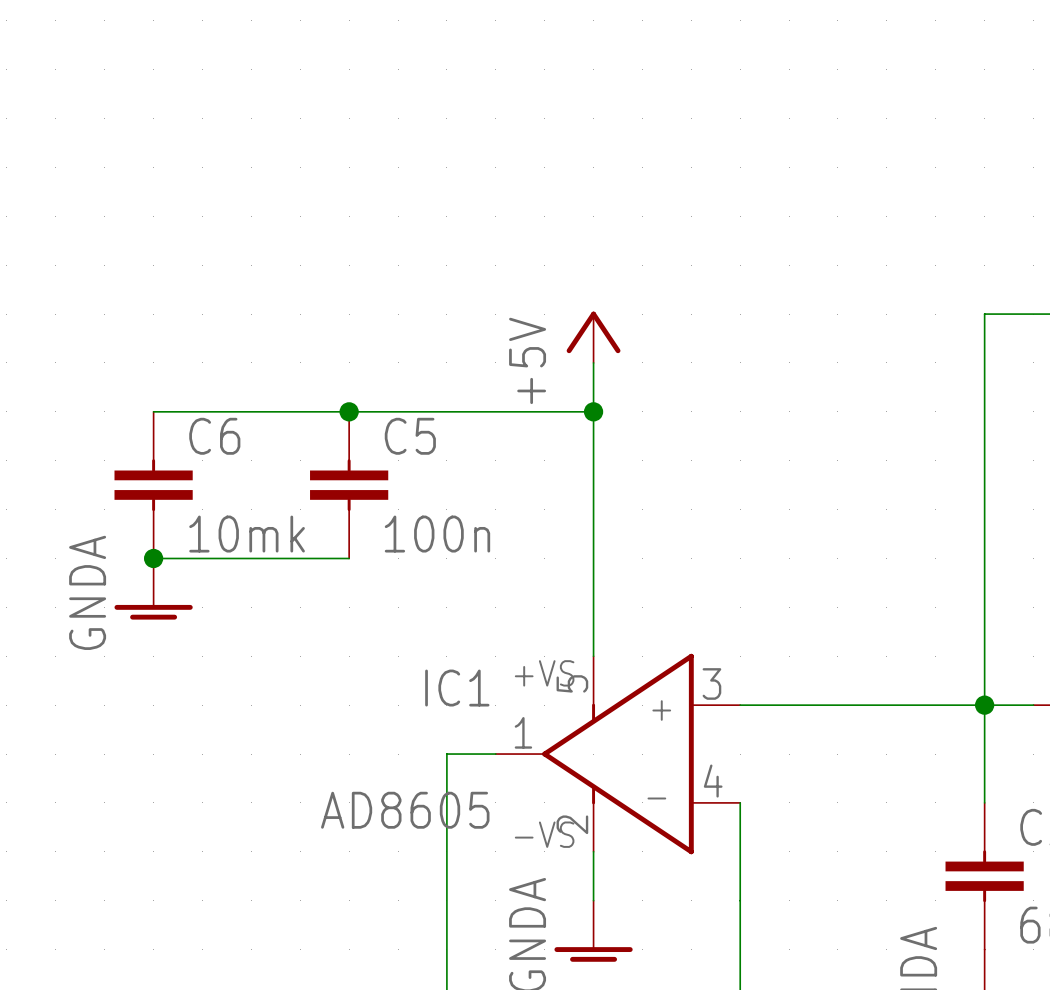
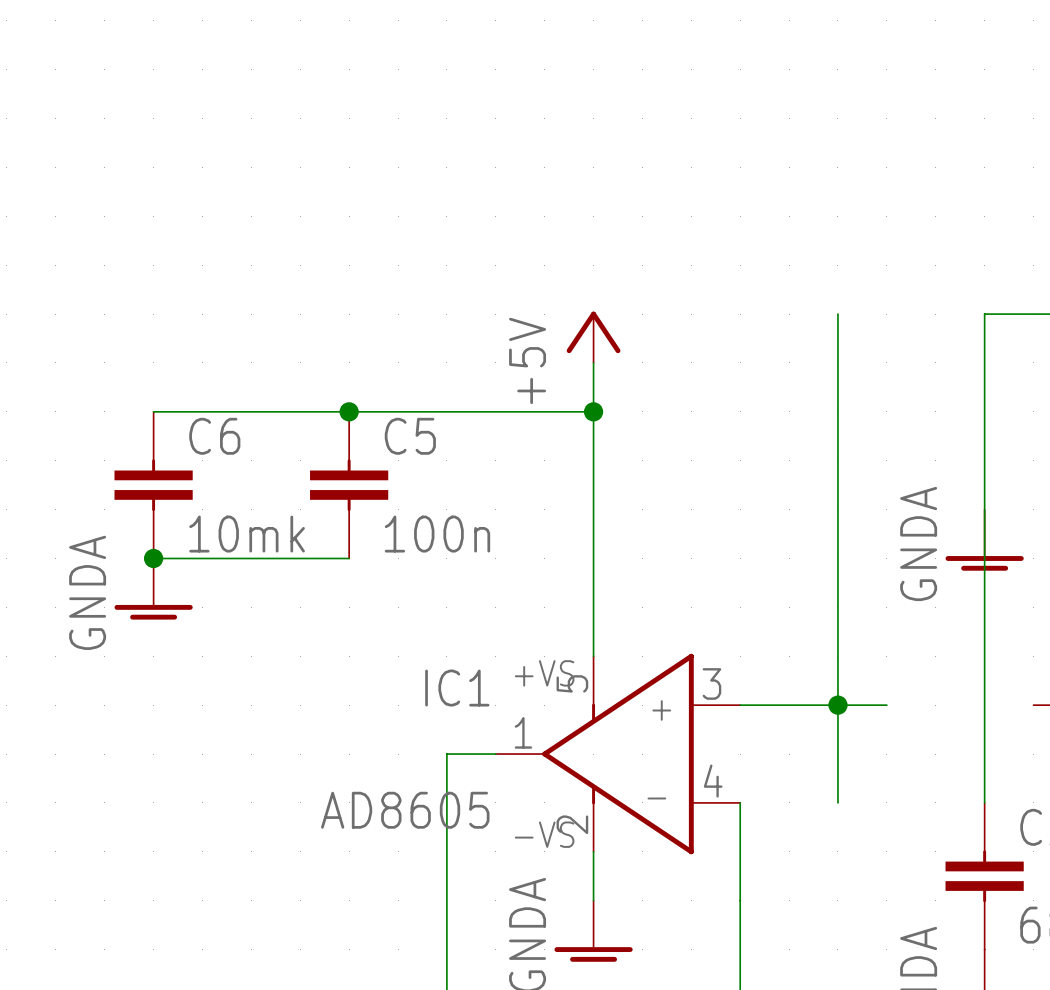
wire: none -> (837, 314) (837, 802)
power symbol: none -> GNDA (984, 540)
junction: none -> (837, 705)
wire: (886, 705) (1033, 705) -> none
junction: (984, 705) -> none

